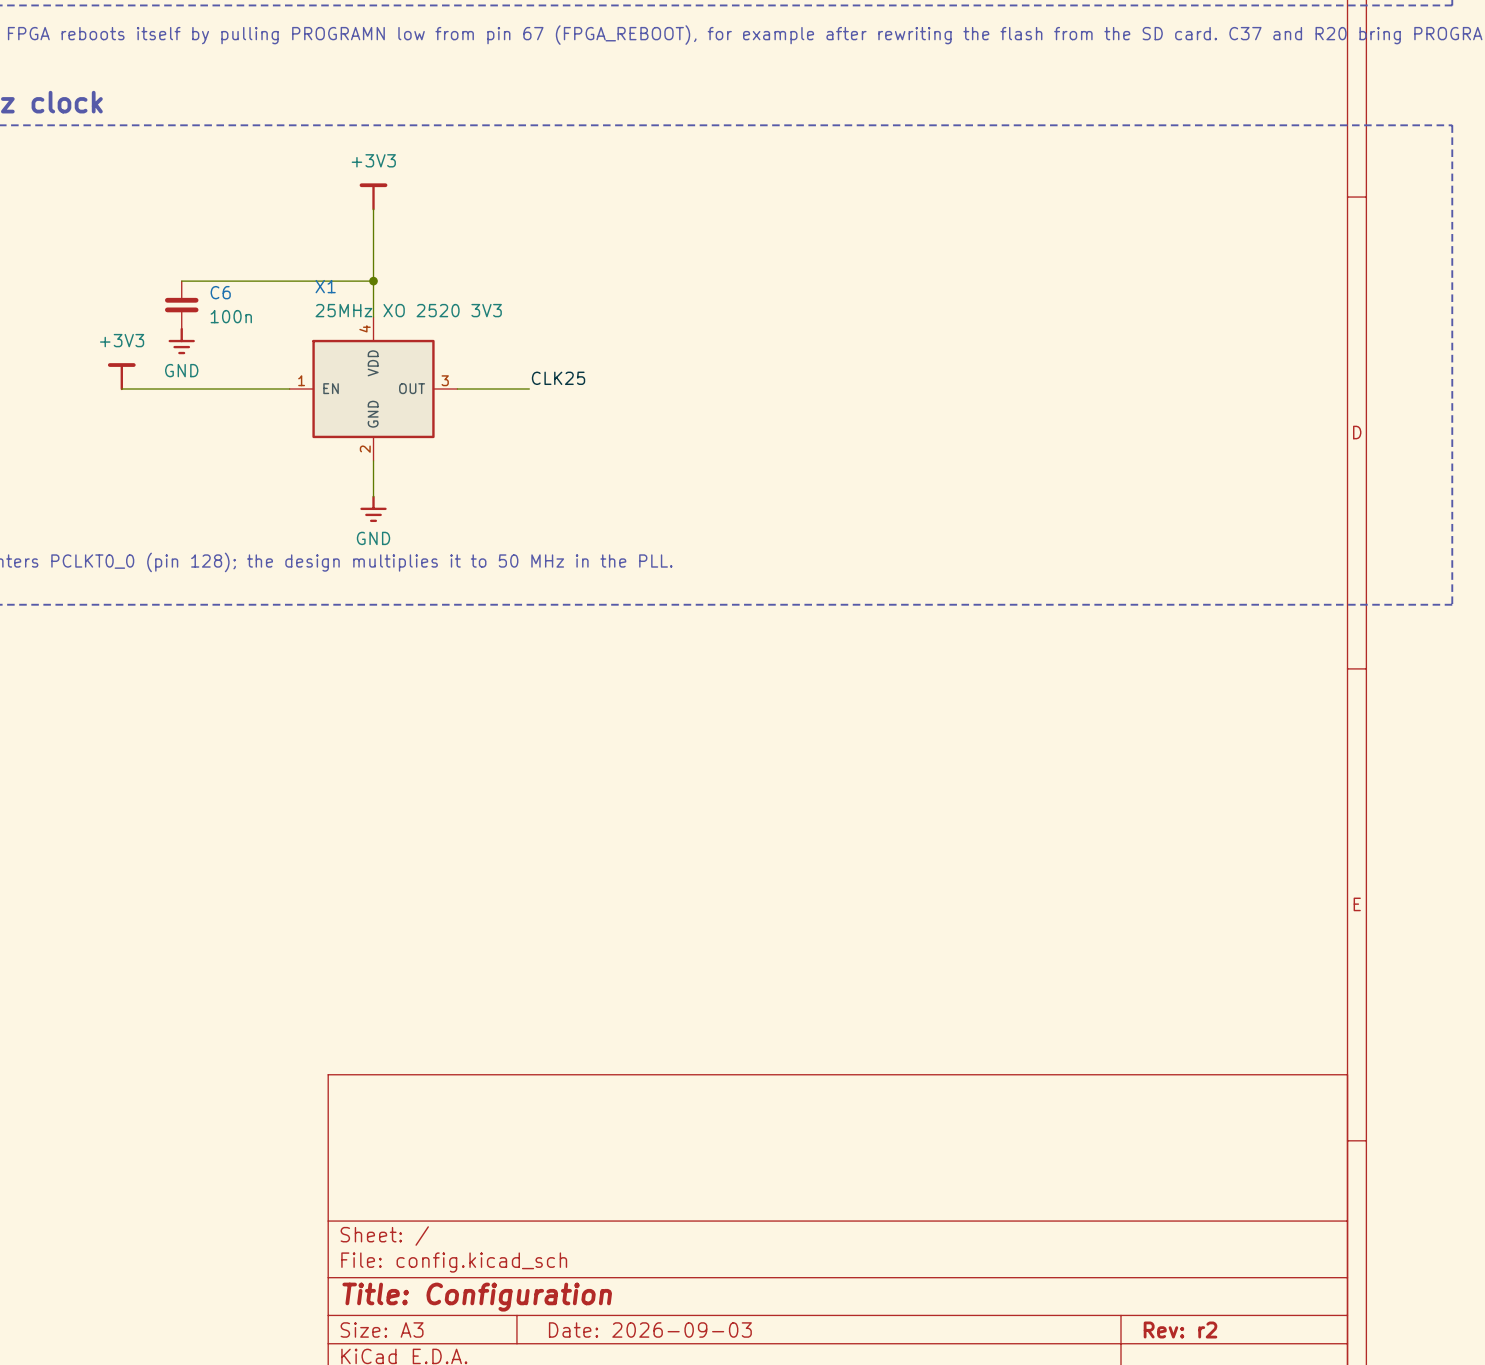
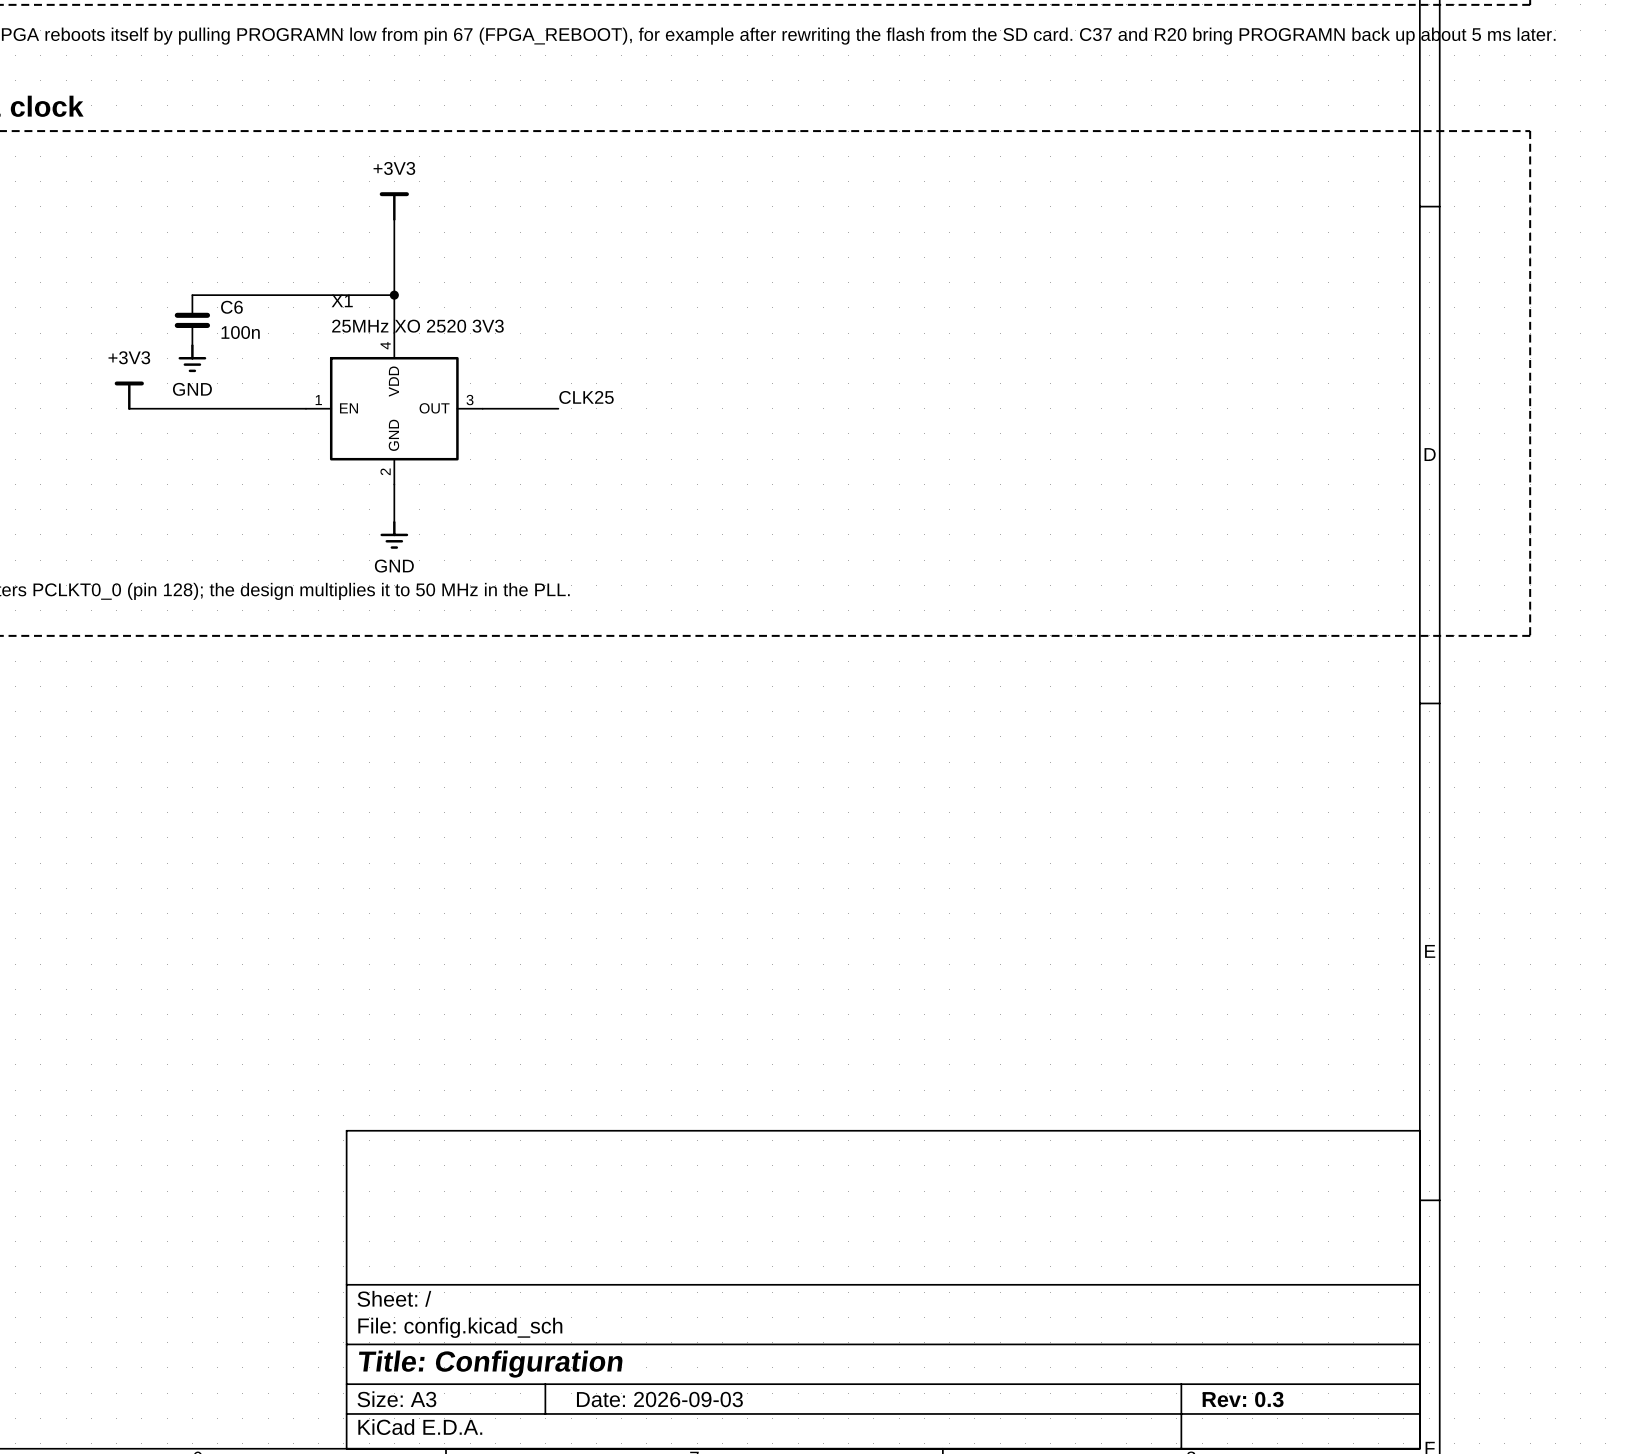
title block: Rev: r2 (1180, 1330) -> Rev: 0.3 (1243, 1399)

